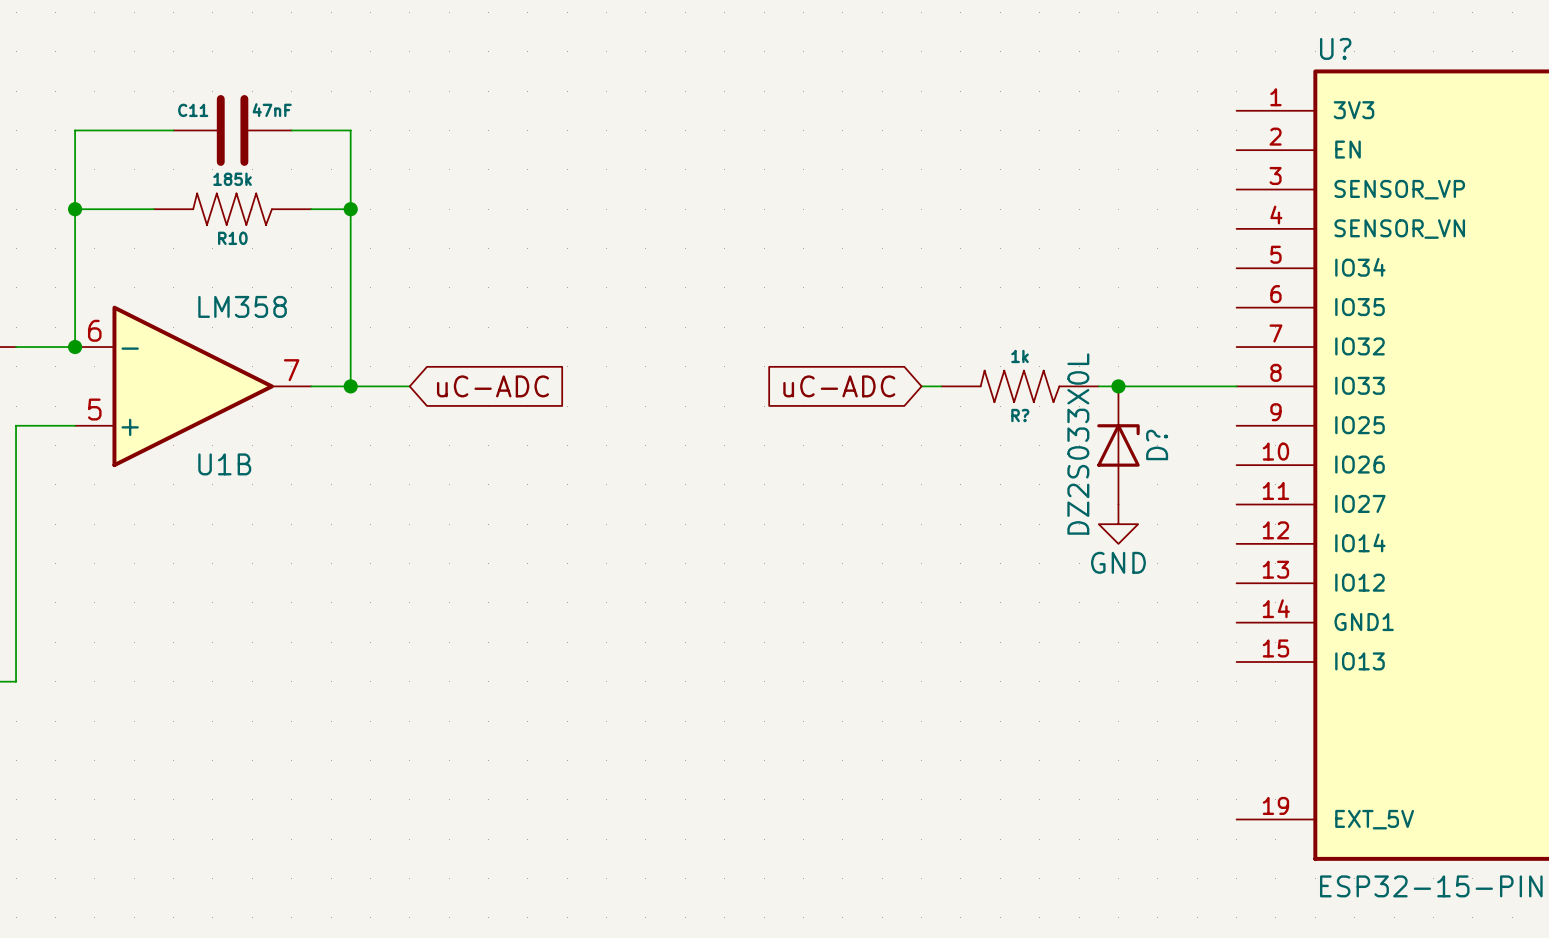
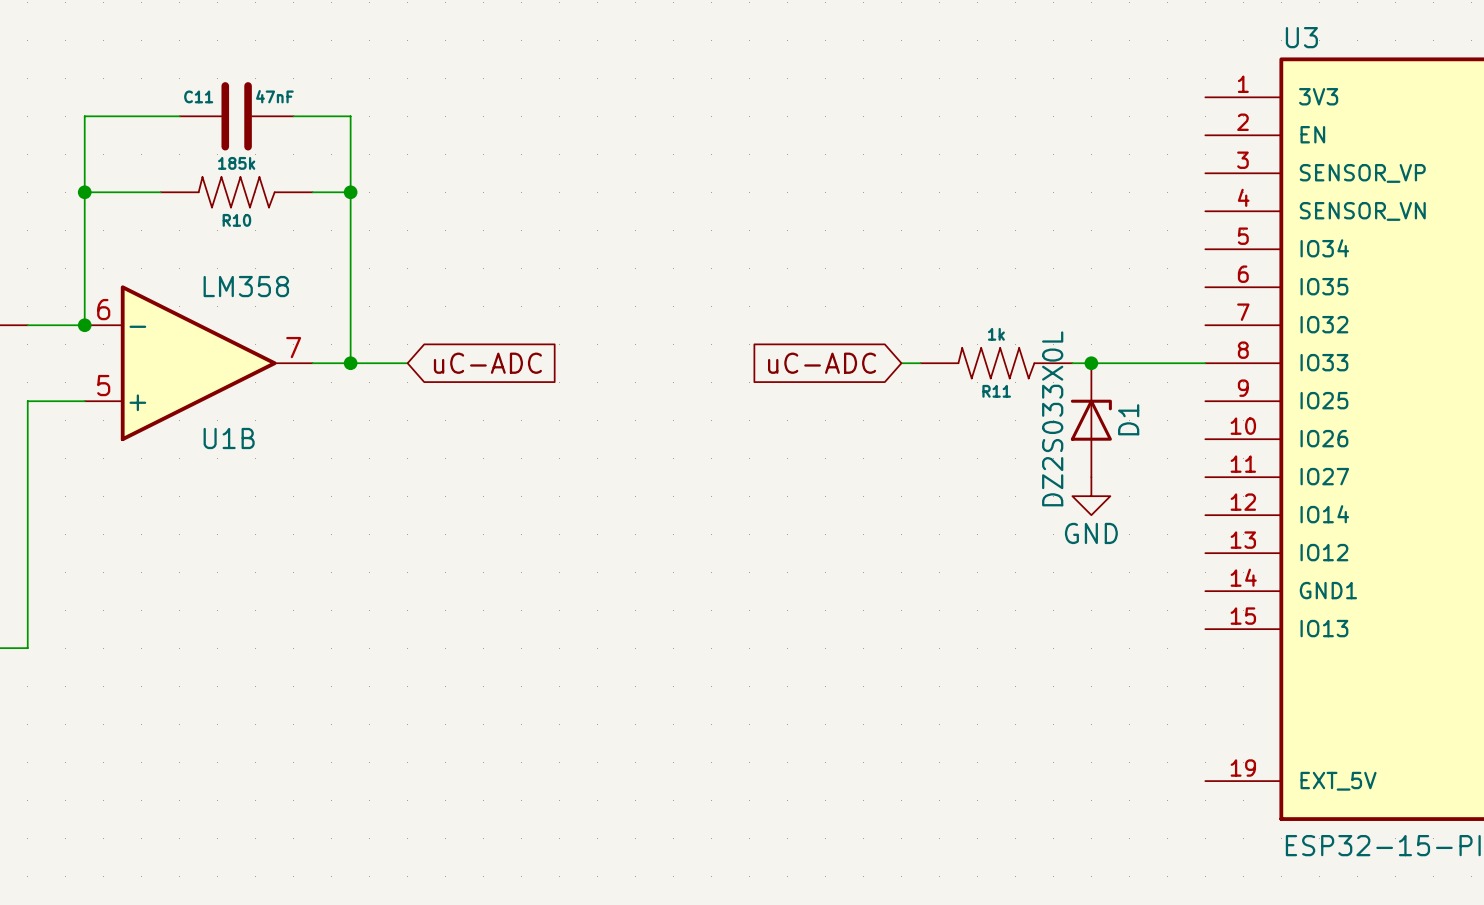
U? name: U? (1335, 48) -> U3 (1301, 37)
R? name: R? (1020, 415) -> R11 (996, 391)
D? name: D? (1157, 444) -> D1 (1128, 419)

